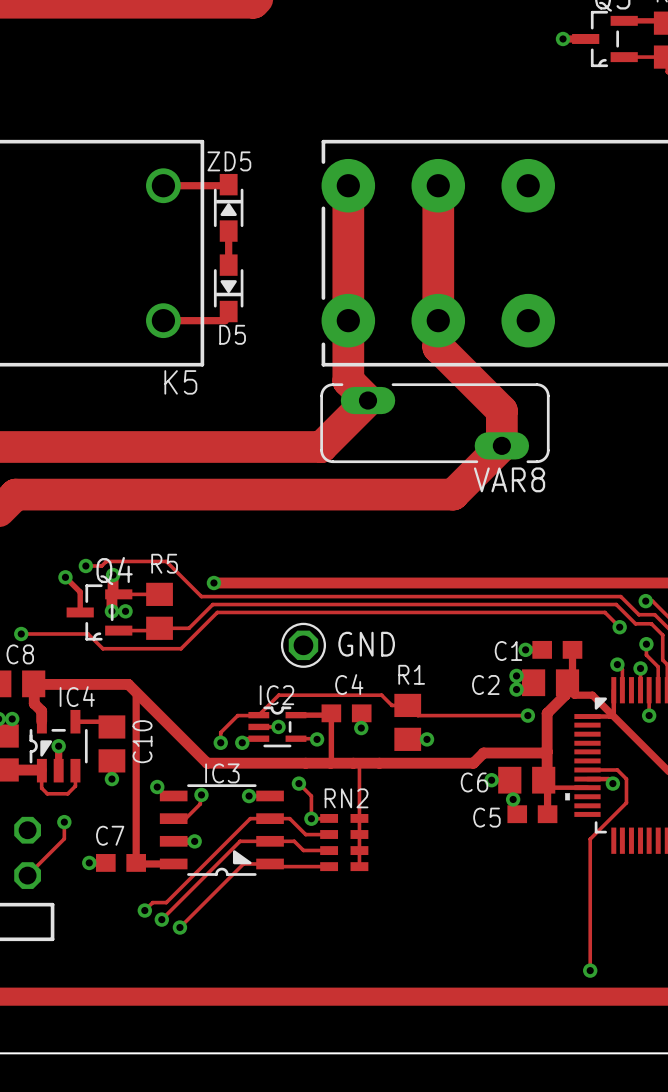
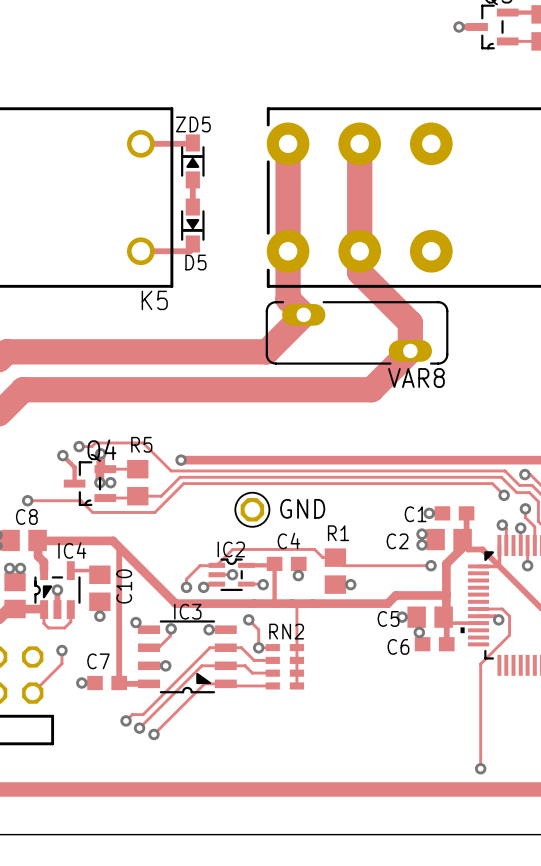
C6 name: C6 (474, 782) -> C5 (388, 618)
C5 name: C5 (486, 817) -> C6 (398, 646)

